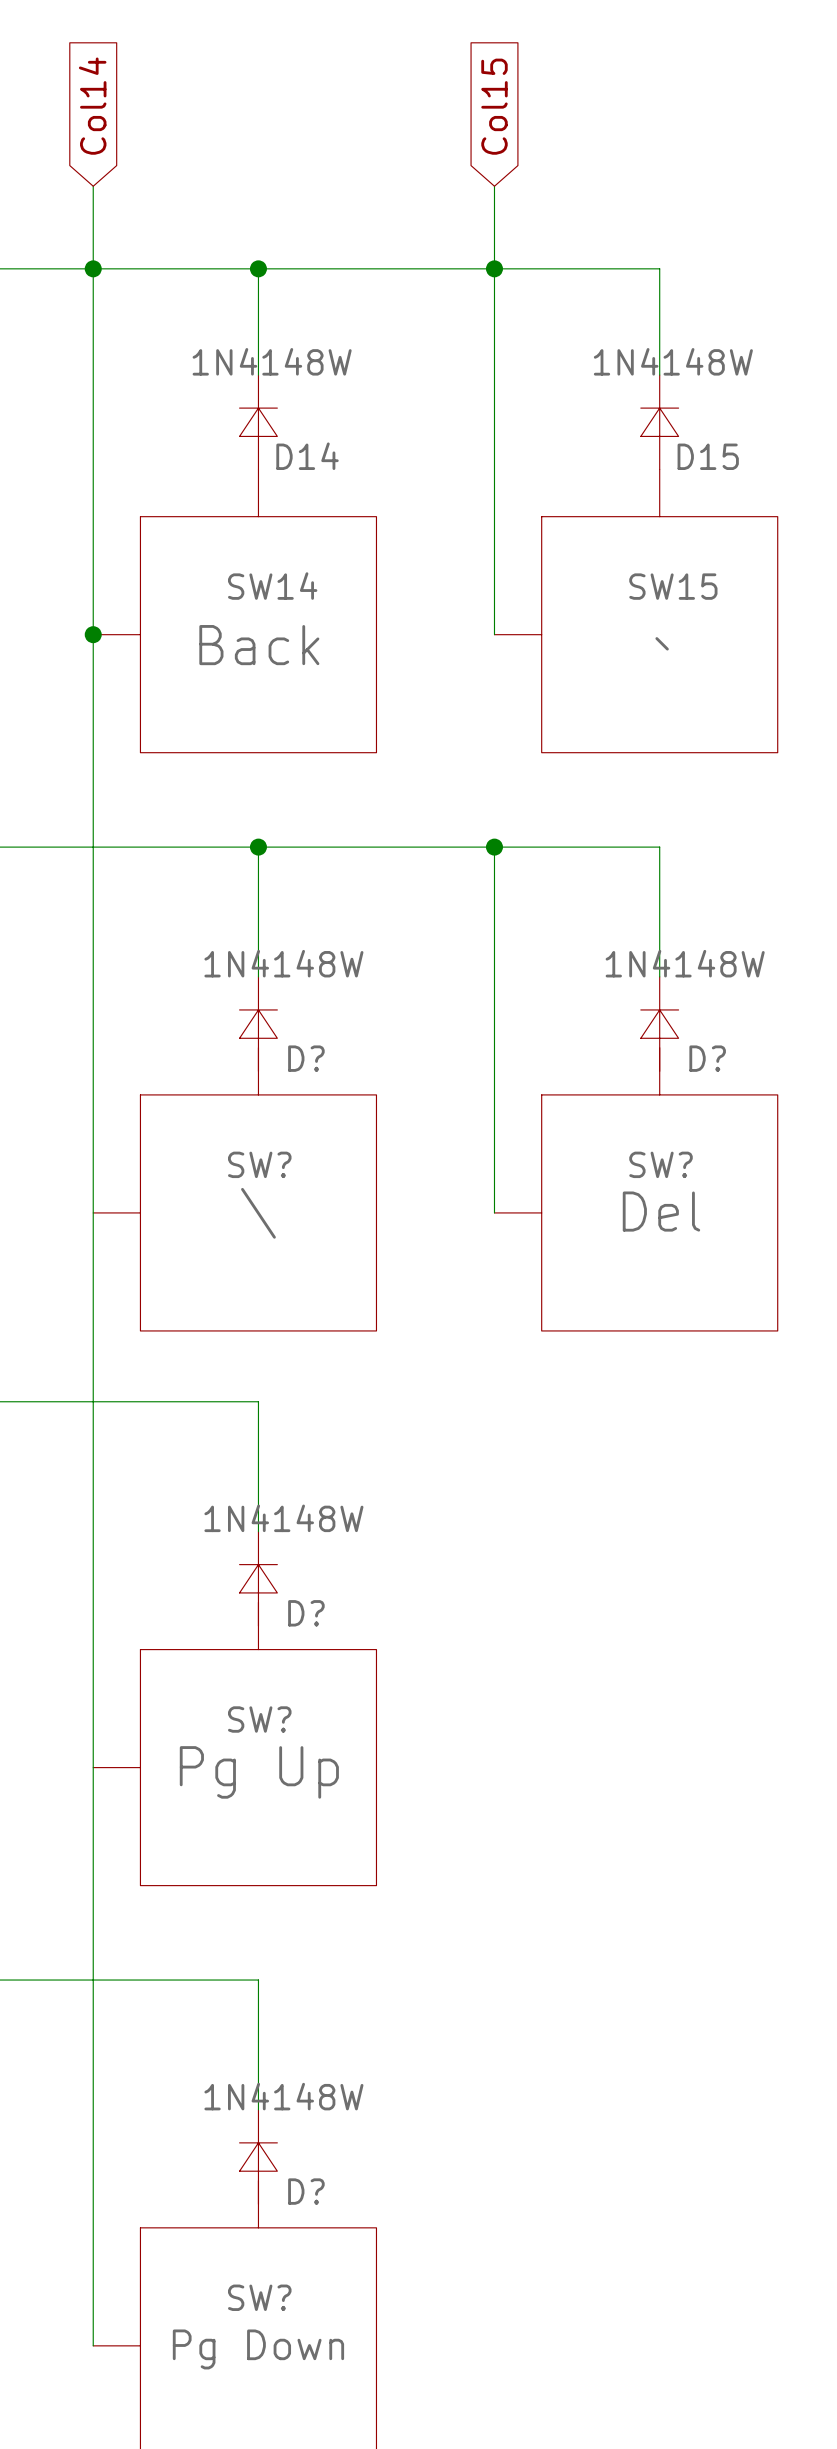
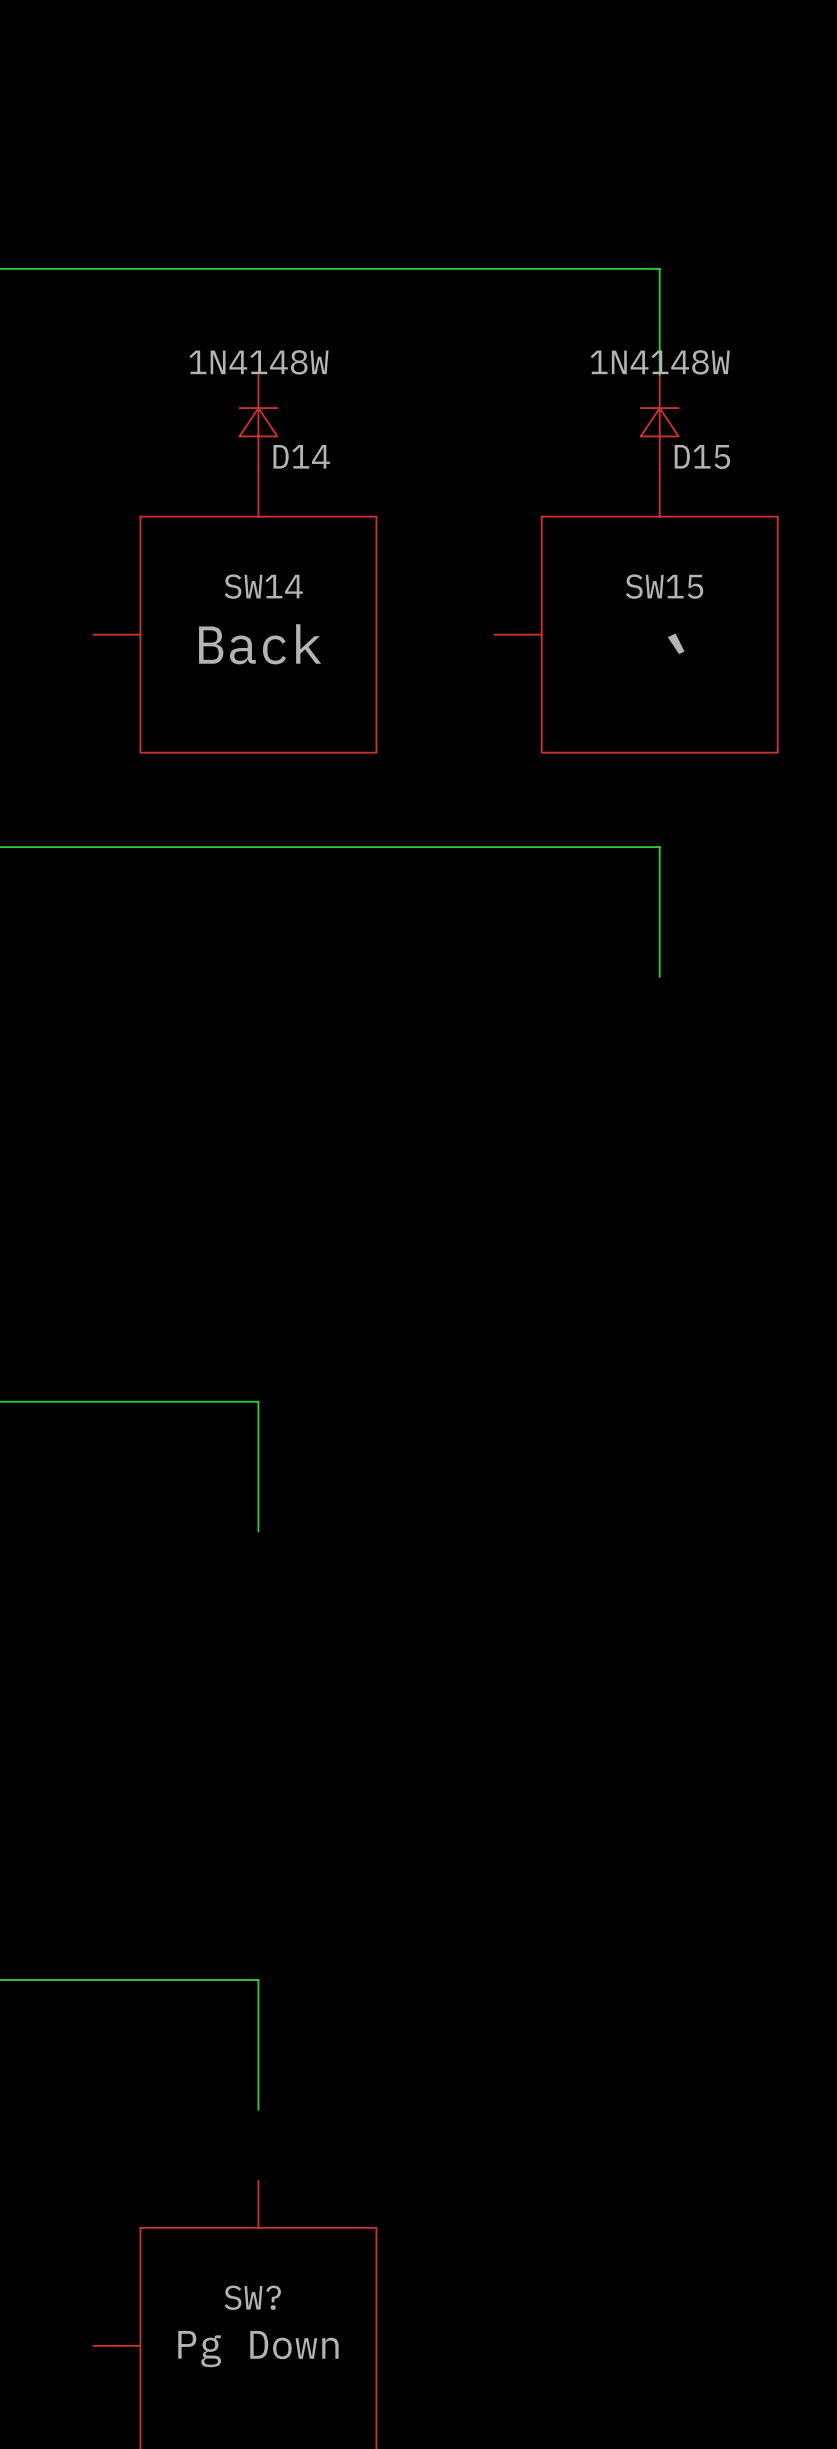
global label: Col14 (92, 106) -> none
global label: Col15 (494, 106) -> none
wire: (93, 186) (93, 2345) -> none
wire: (494, 186) (494, 634) -> none
junction: (93, 268) -> none
wire: (258, 268) (258, 375) -> none
junction: (258, 268) -> none
junction: (494, 268) -> none
junction: (93, 634) -> none
wire: (258, 847) (258, 976) -> none
junction: (258, 847) -> none
wire: (494, 847) (494, 1212) -> none
junction: (494, 847) -> none
D?: 1N4148W (258, 1024) -> none
D?: 1N4148W (659, 1024) -> none
SW?: \ (234, 1189) -> none
SW?: Del (636, 1189) -> none
D?: 1N4148W (258, 1578) -> none
SW?: Pg Up (234, 1743) -> none
D?: 1N4148W (258, 2157) -> none

